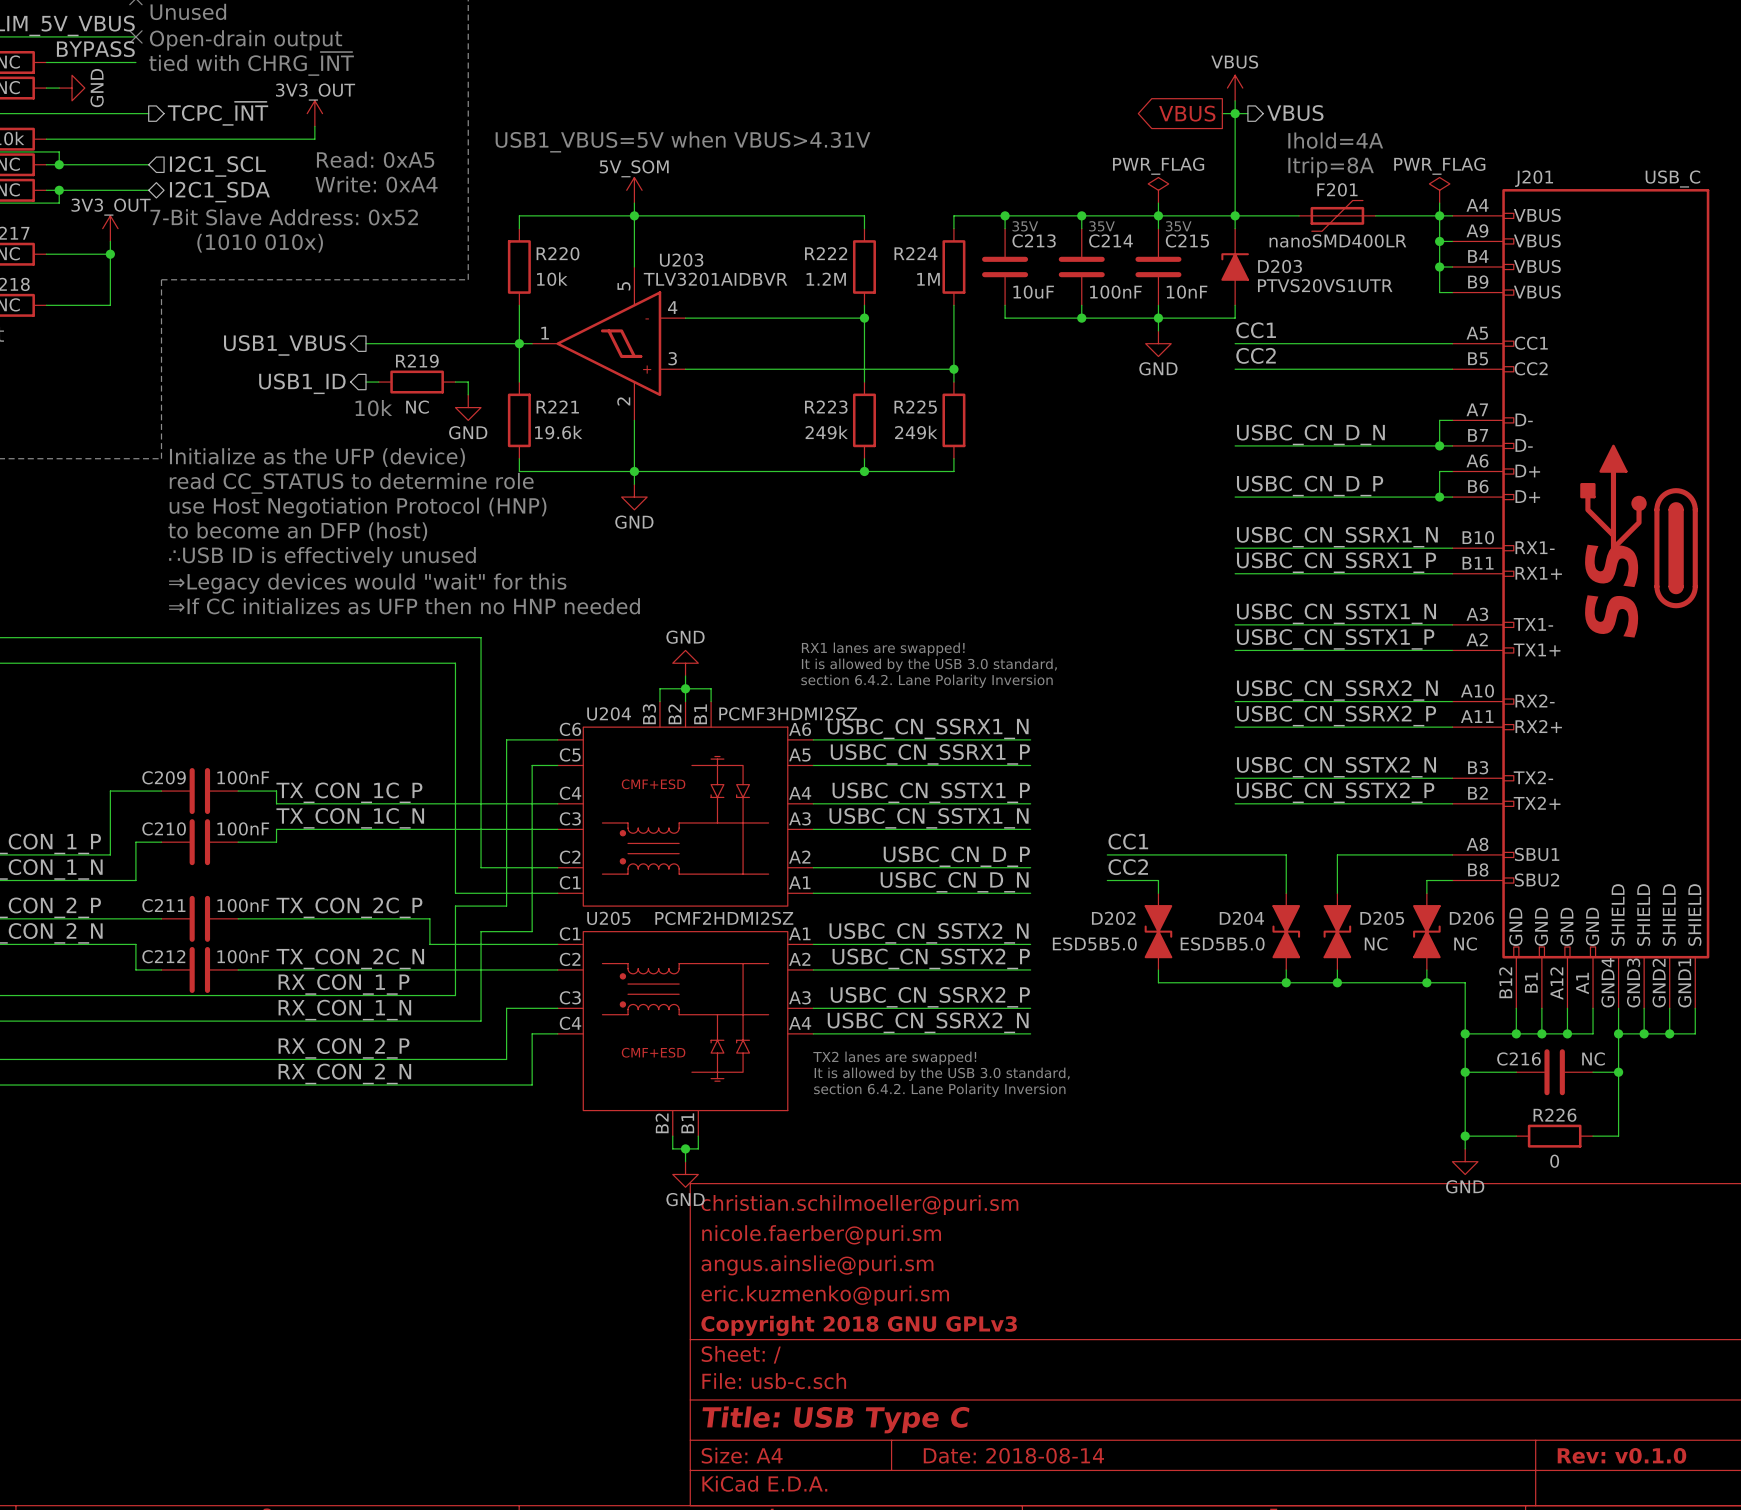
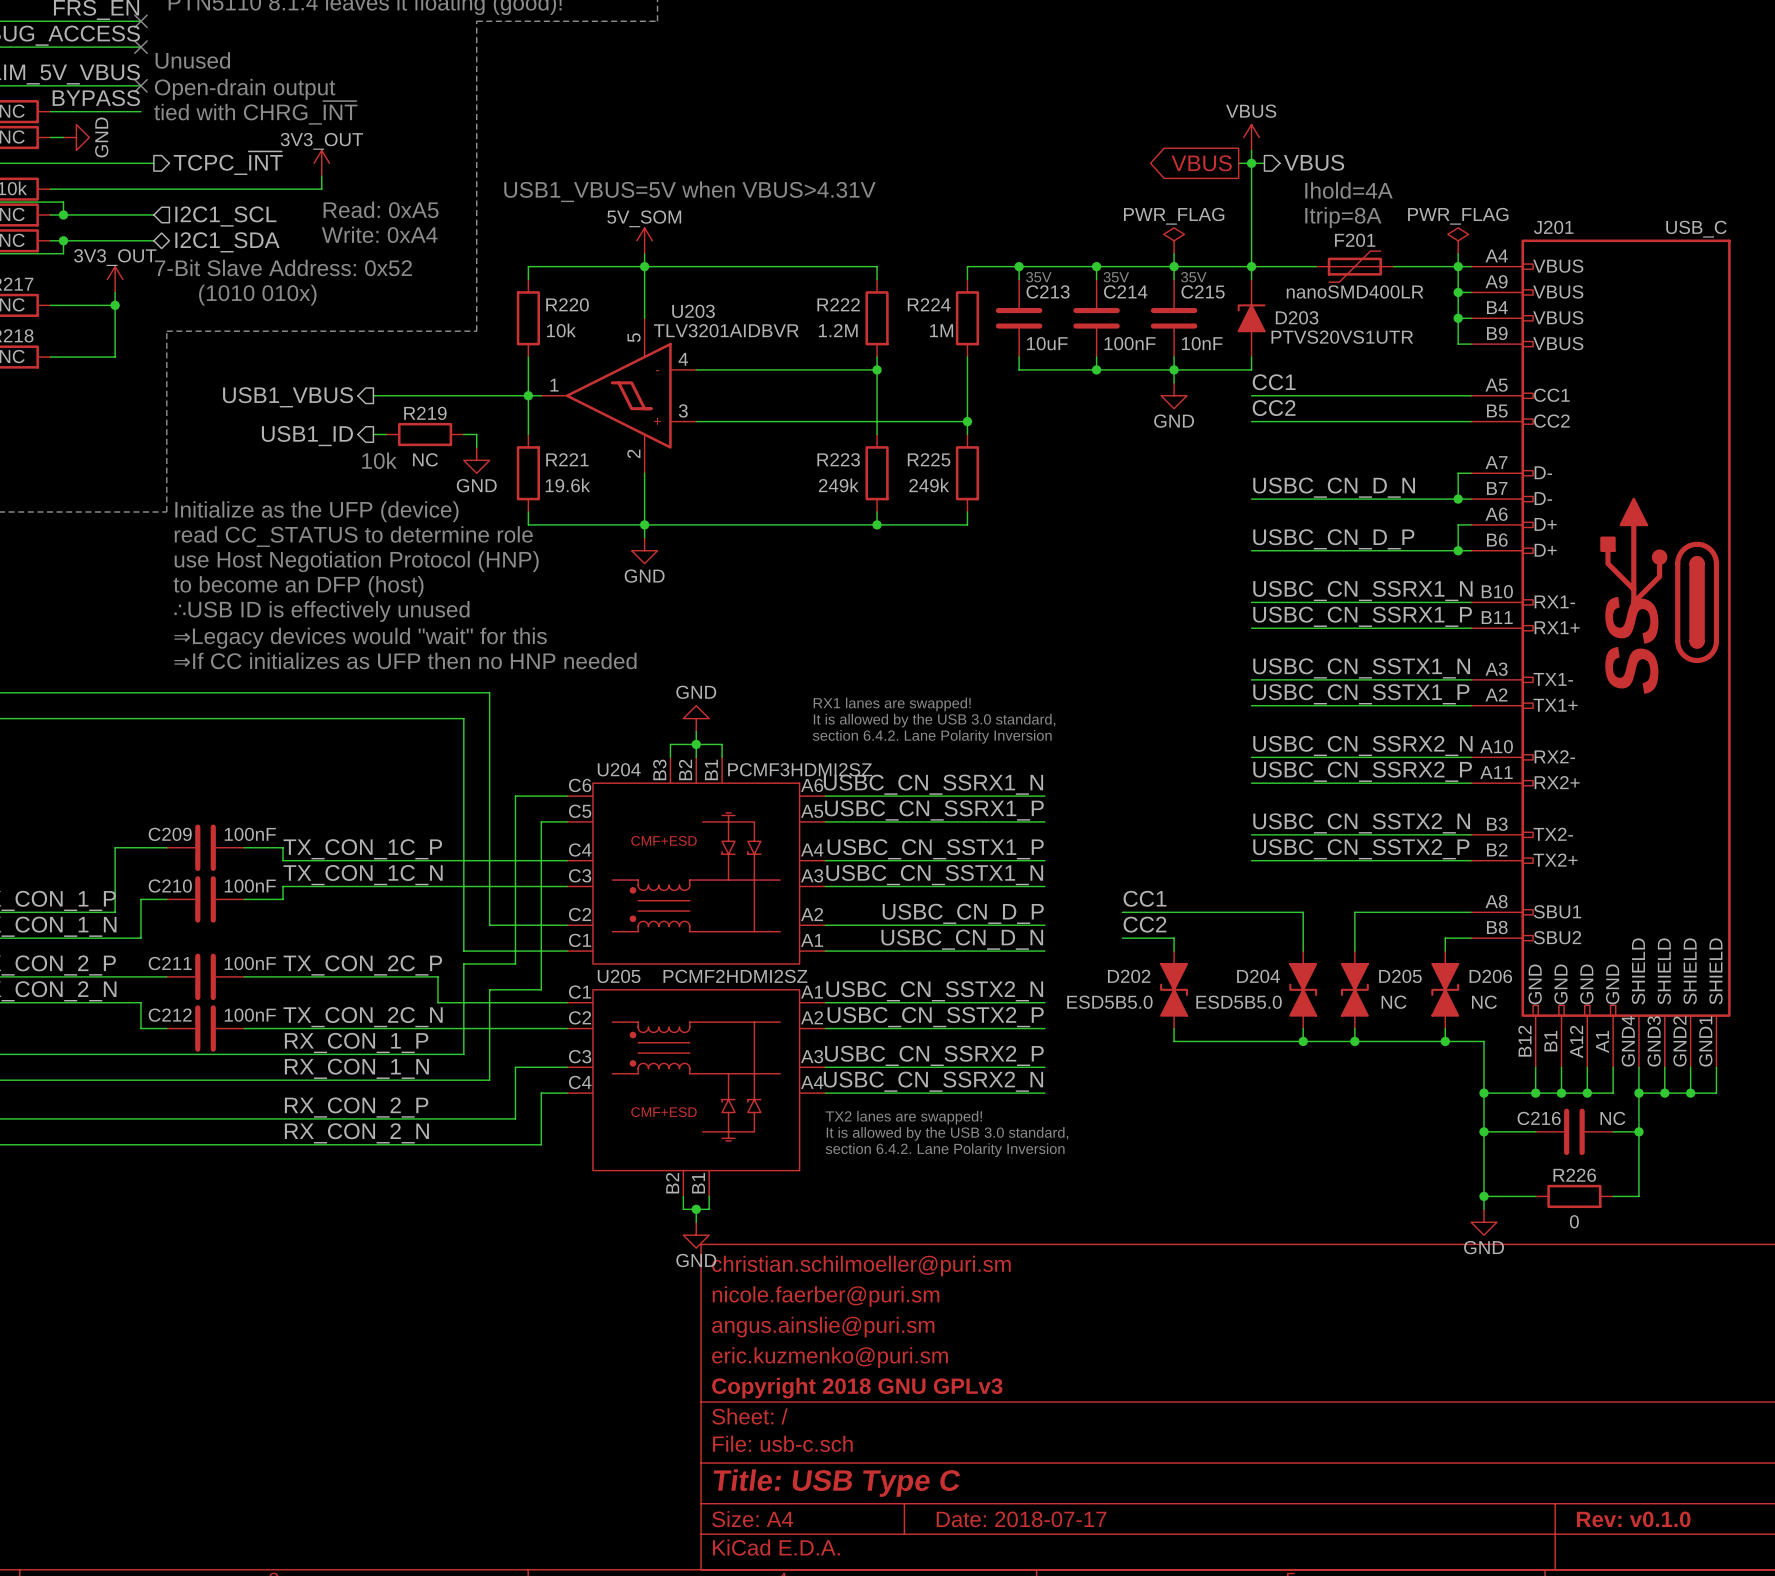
title block: Date: 2018-08-14 (1013, 1455) -> Date: 2018-07-17 (1021, 1519)

